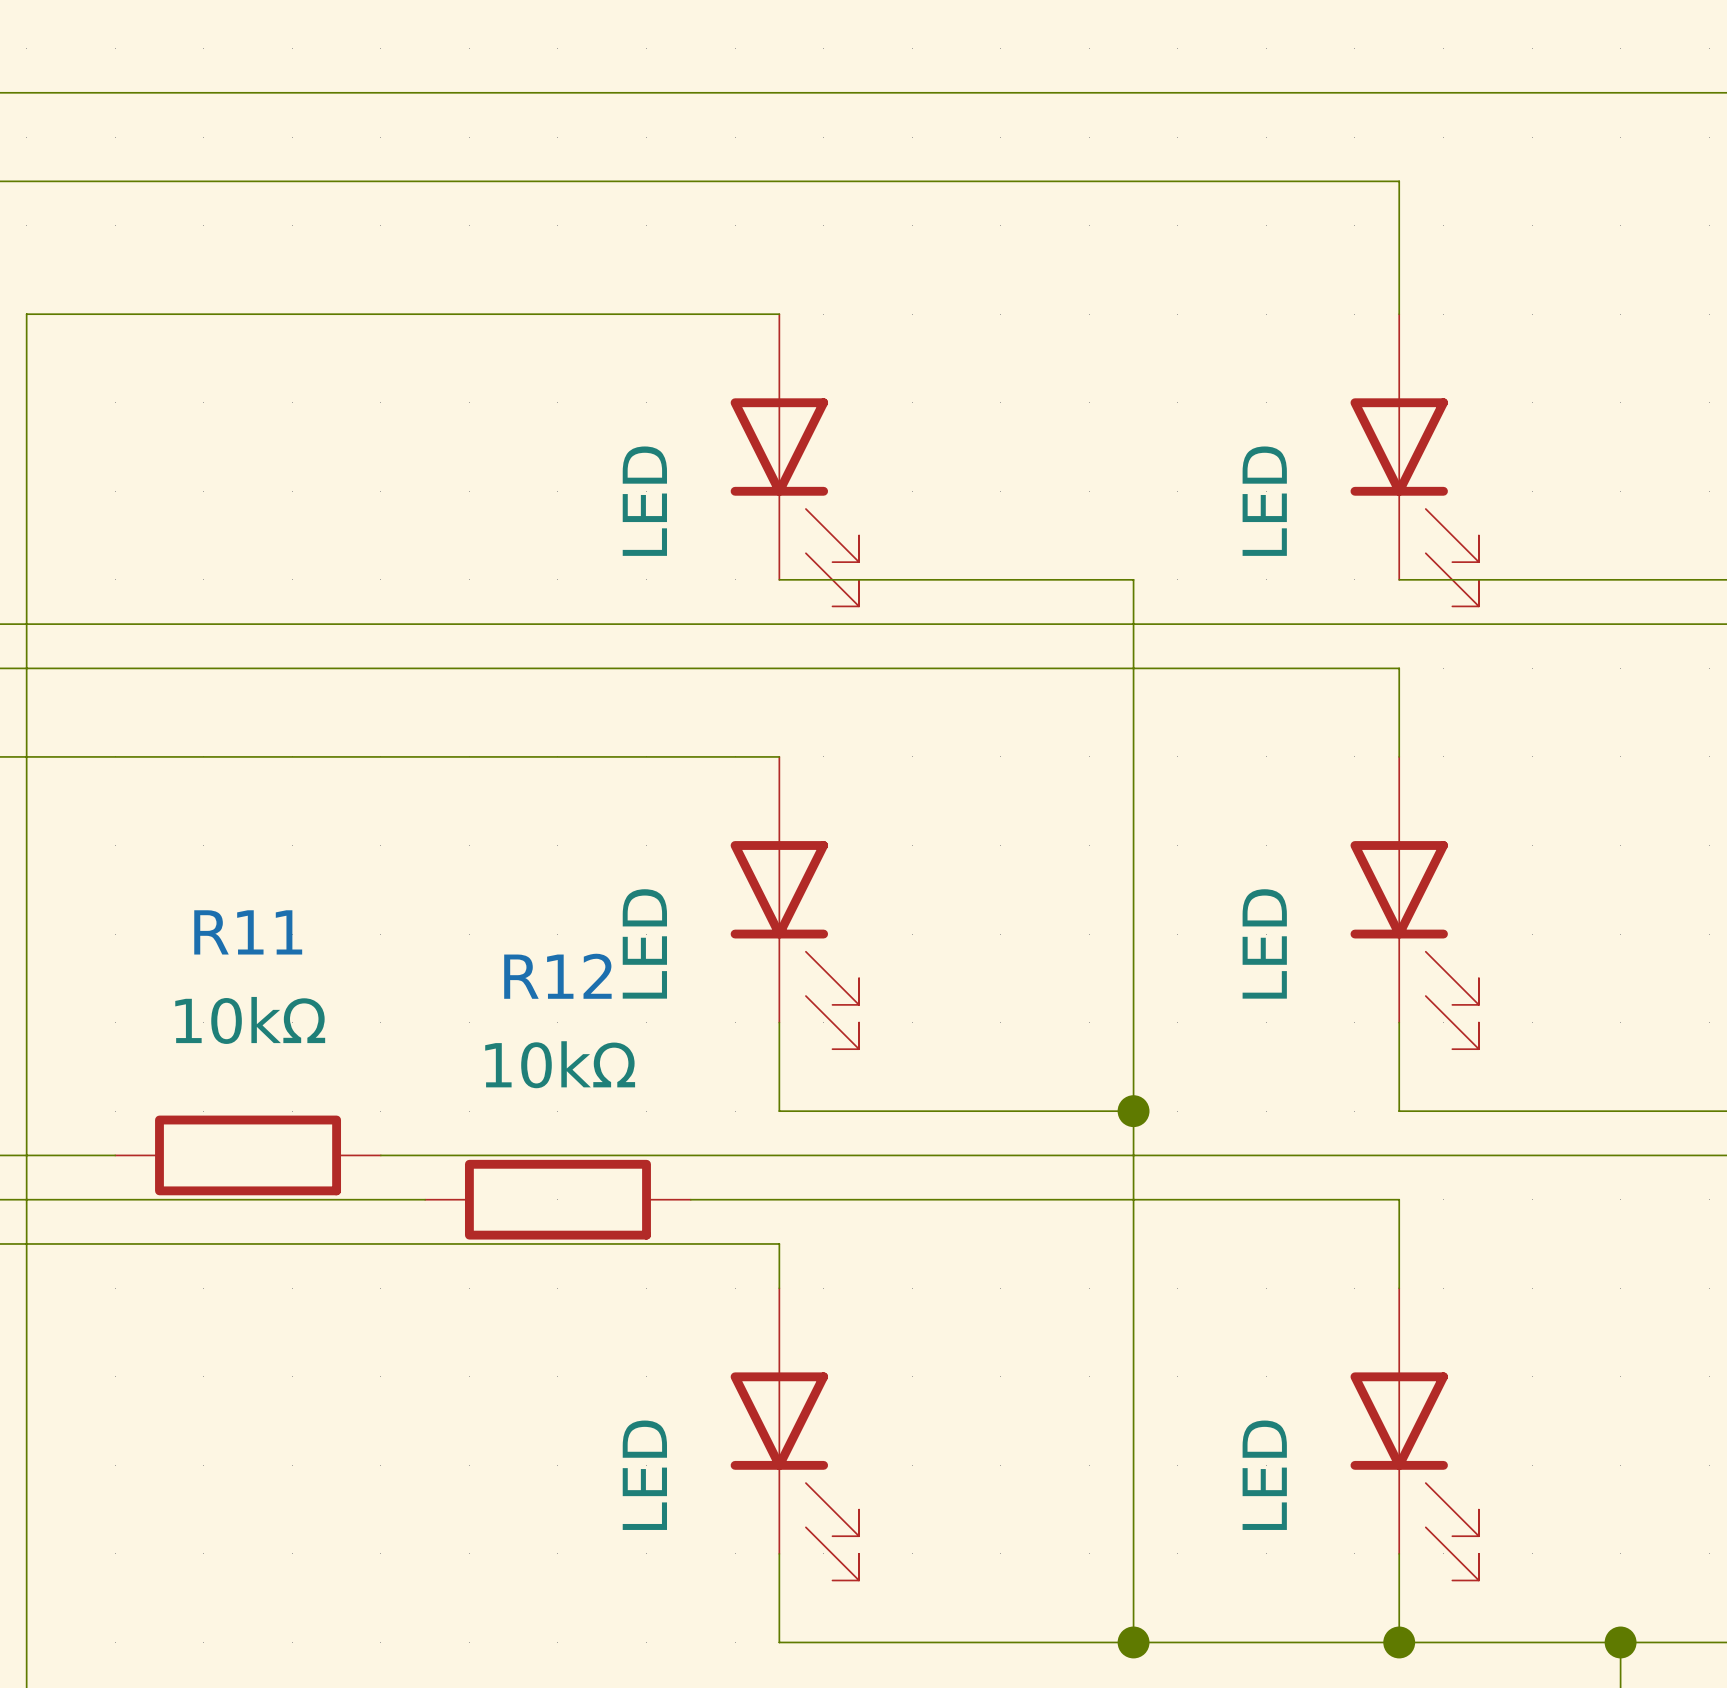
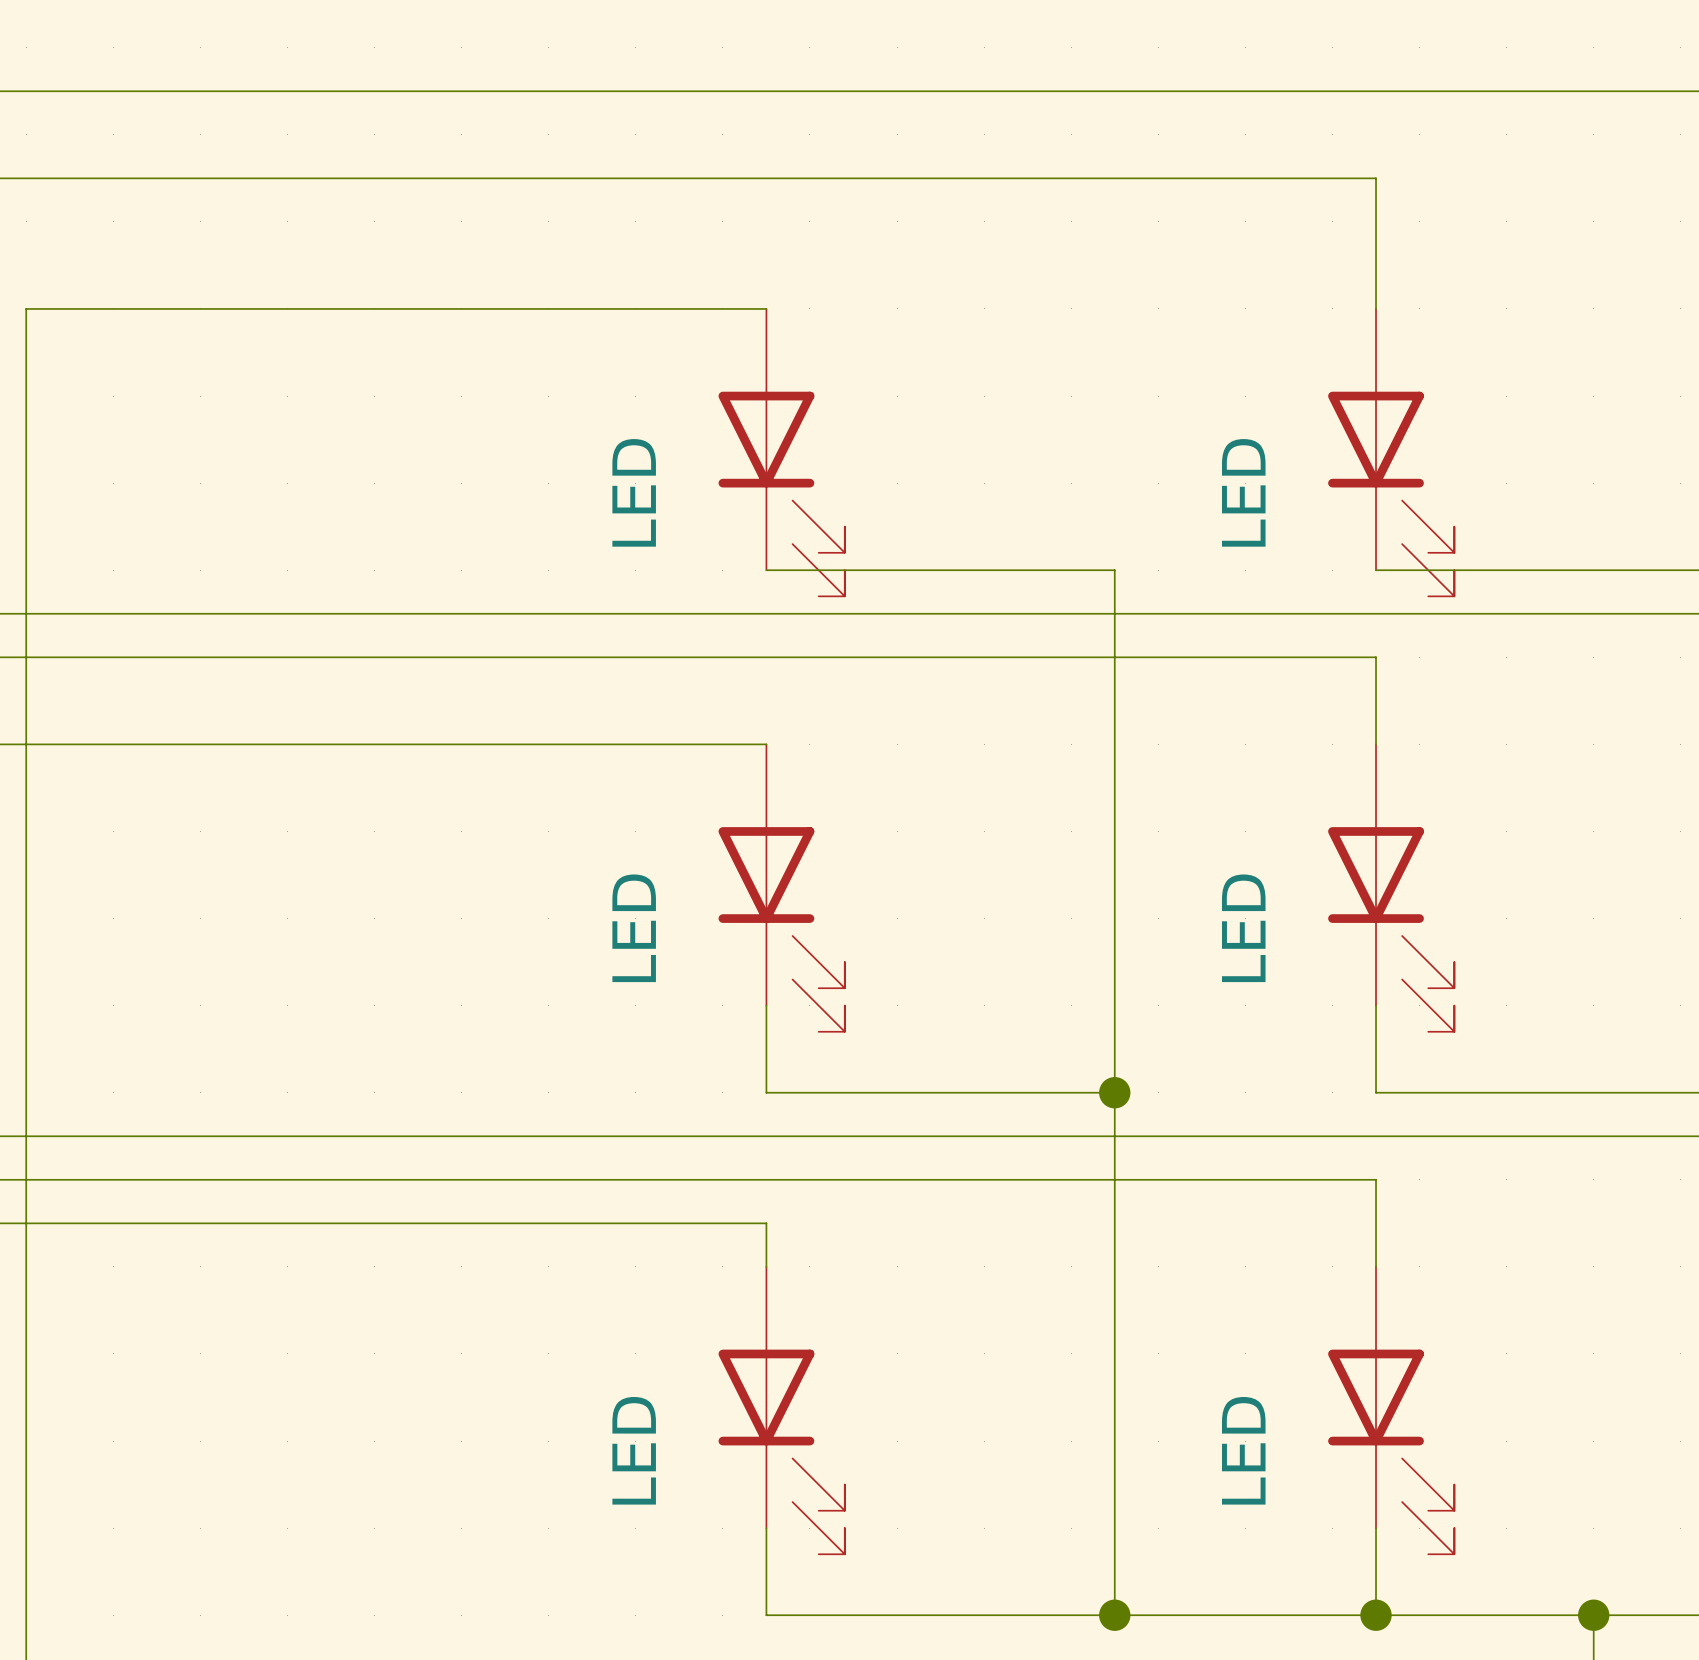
wire: none -> (113, 1136) (374, 1136)
R11: 10kΩ (248, 1155) -> none
wire: none -> (418, 1179) (679, 1179)
R12: 10kΩ (557, 1199) -> none

